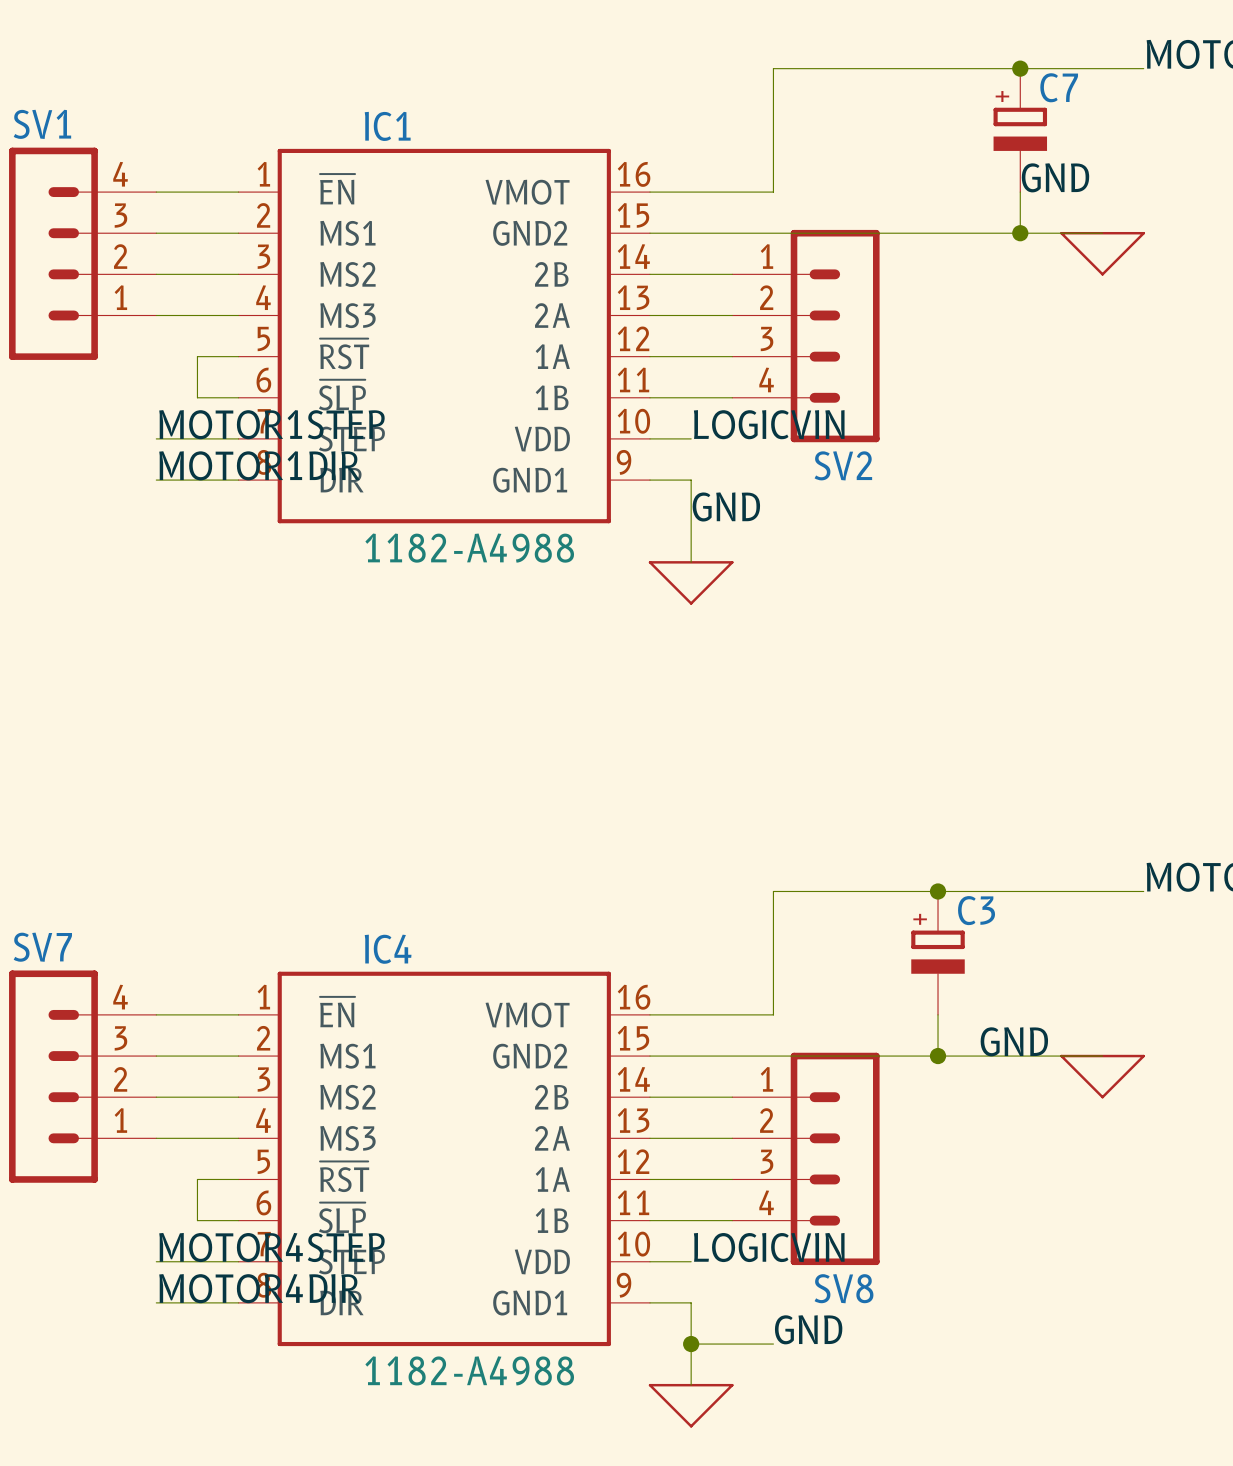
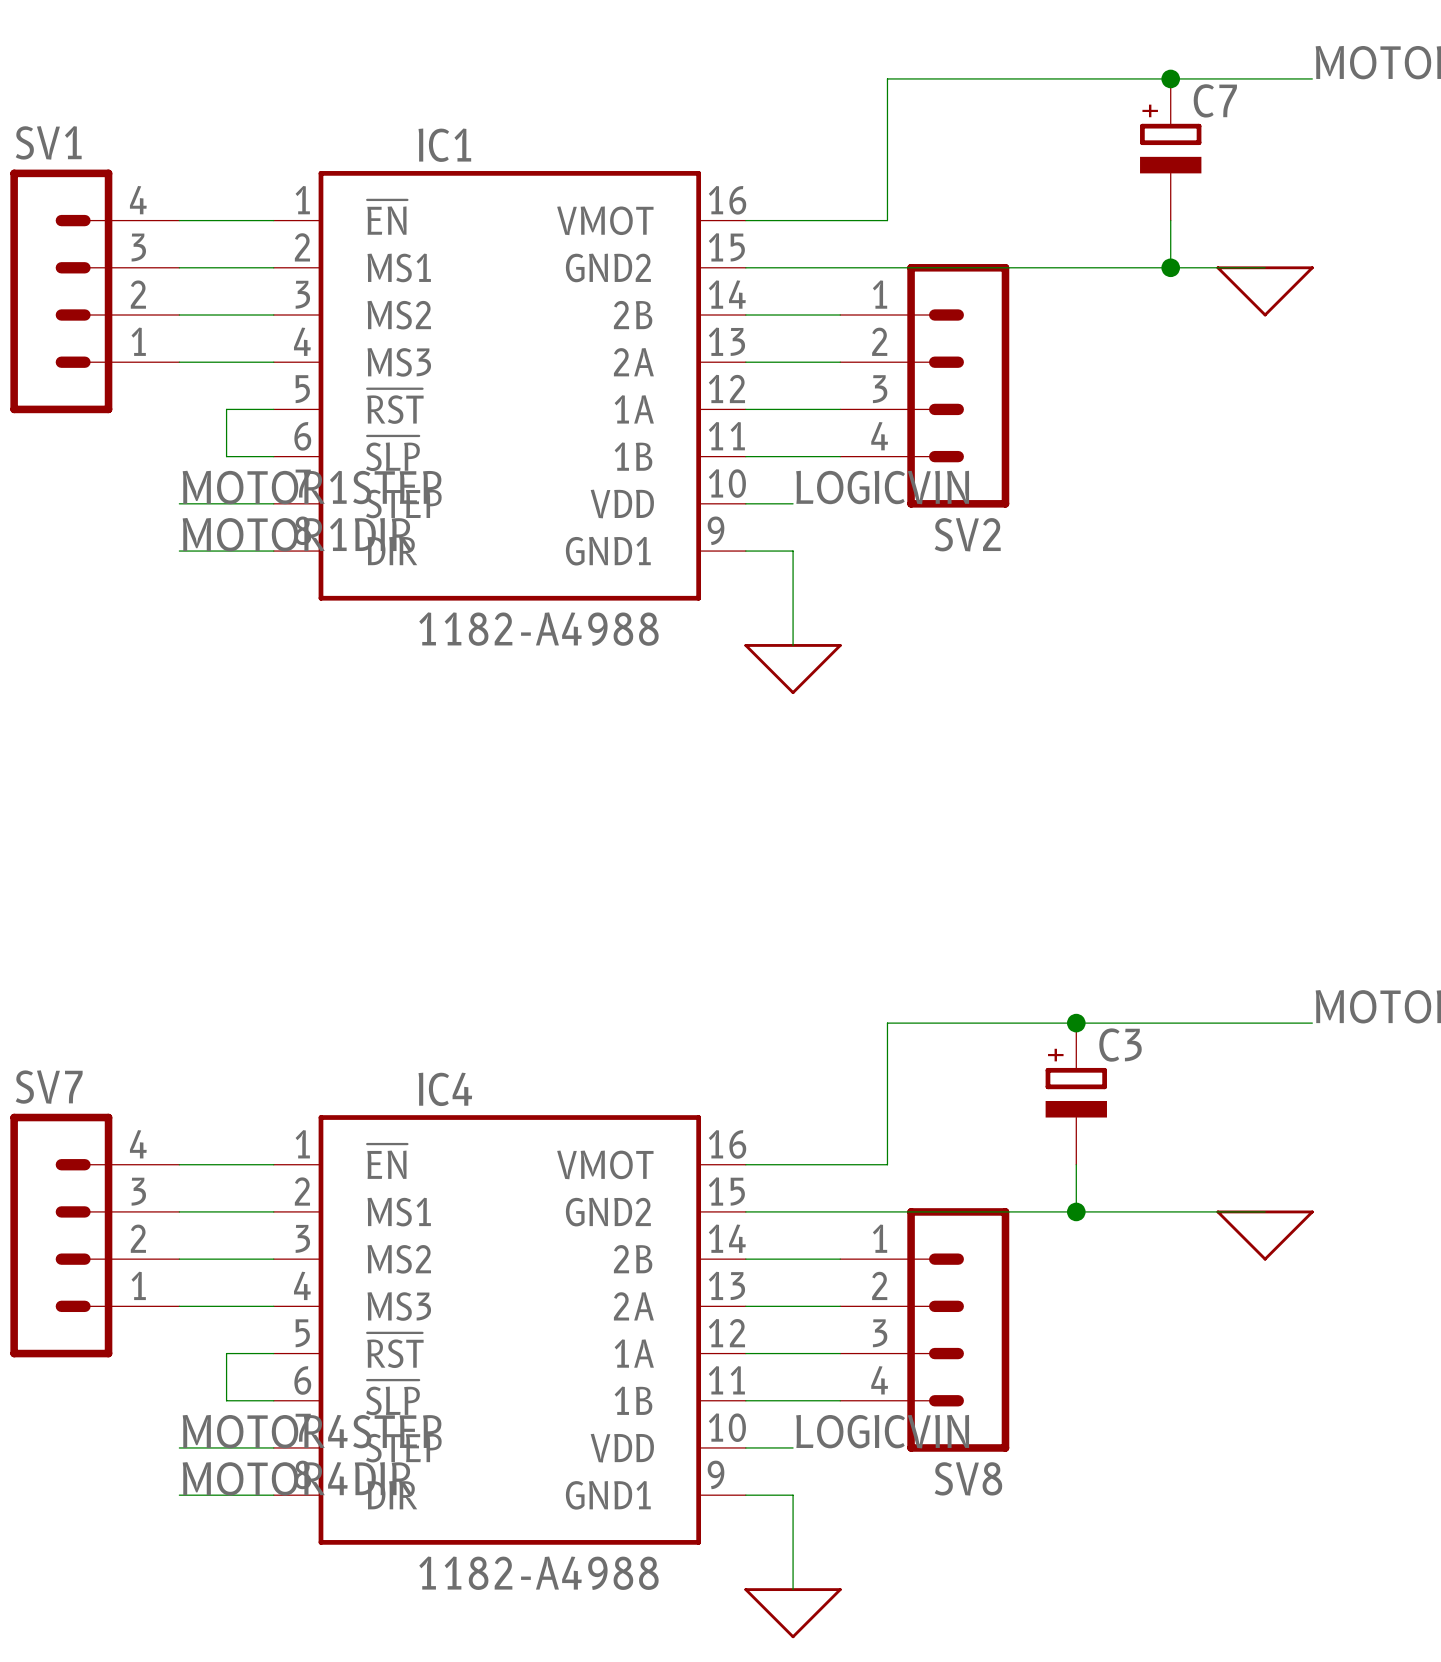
label: GND (1055, 177) -> none
label: GND (726, 506) -> none
label: GND (1014, 1041) -> none
label: GND (808, 1329) -> none
wire: (691, 1344) (773, 1344) -> none
junction: (691, 1344) -> none

